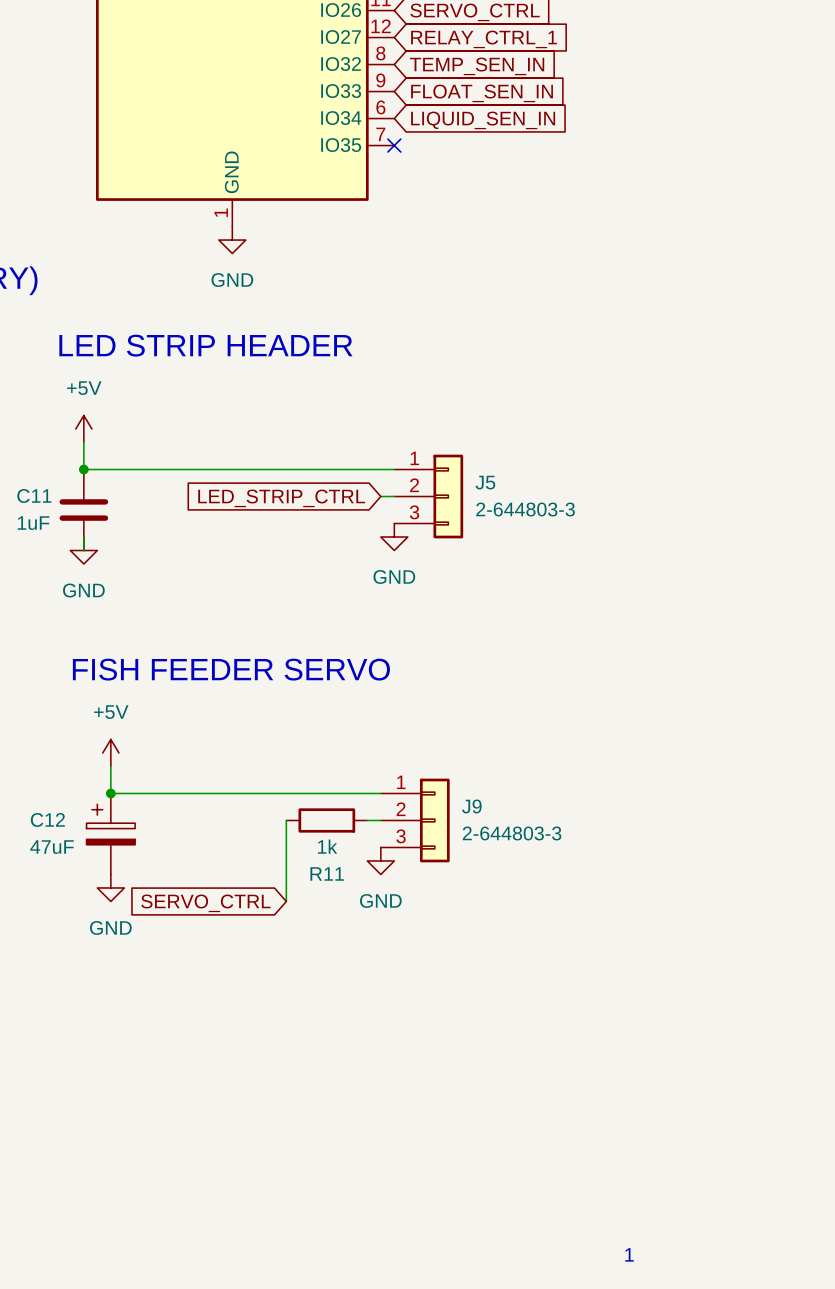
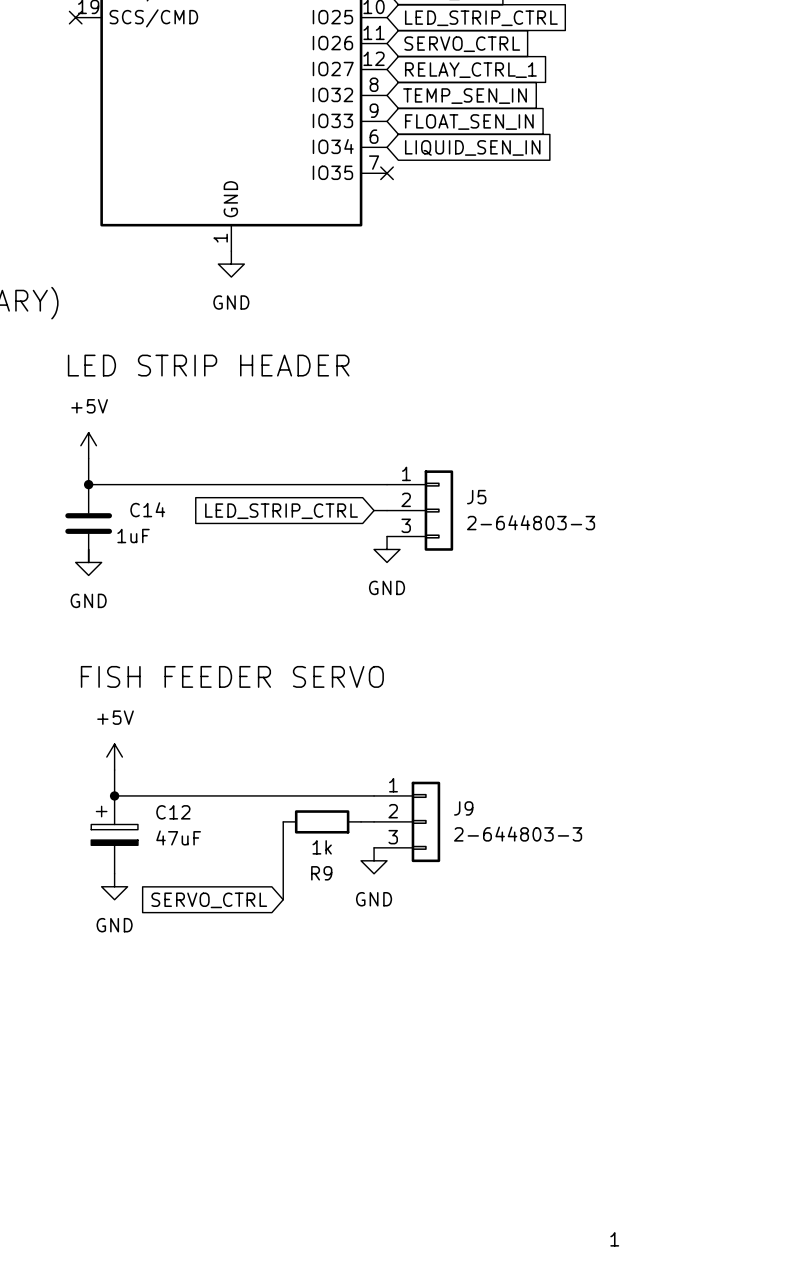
C11 name: C11 (34, 496) -> C14 (147, 509)
C11 value position: 1uF (33, 523) -> 1uF (133, 536)
C12 name position: C12 (47, 819) -> C12 (173, 812)
C12 value position: 47uF (52, 847) -> 47uF (178, 837)
R11 name: R11 (327, 873) -> R9 (321, 873)

